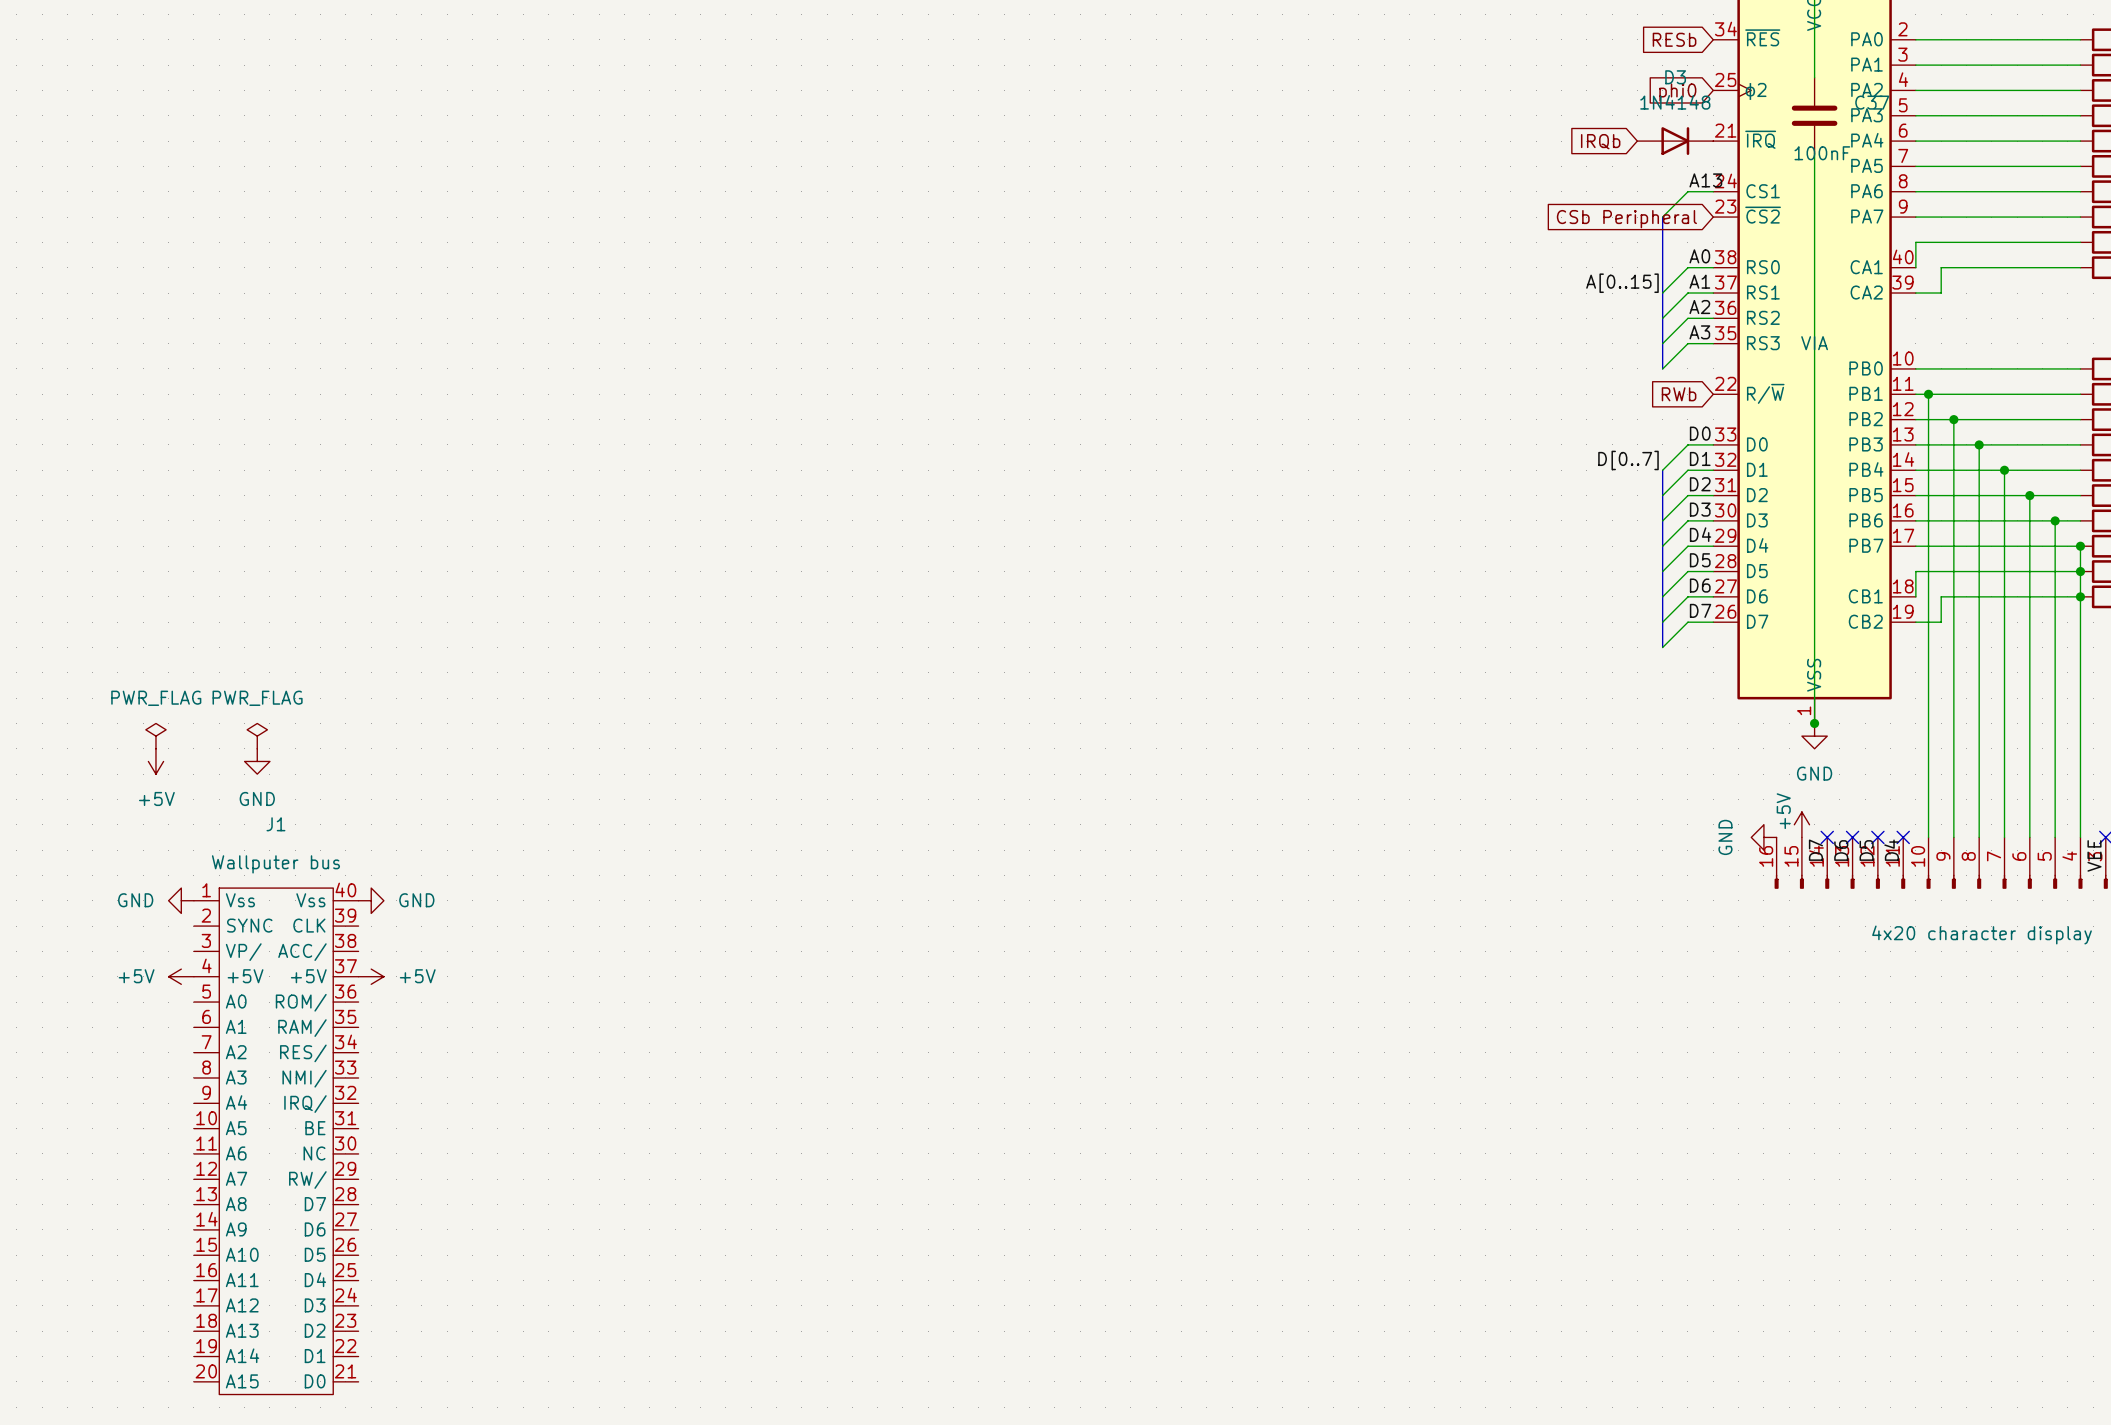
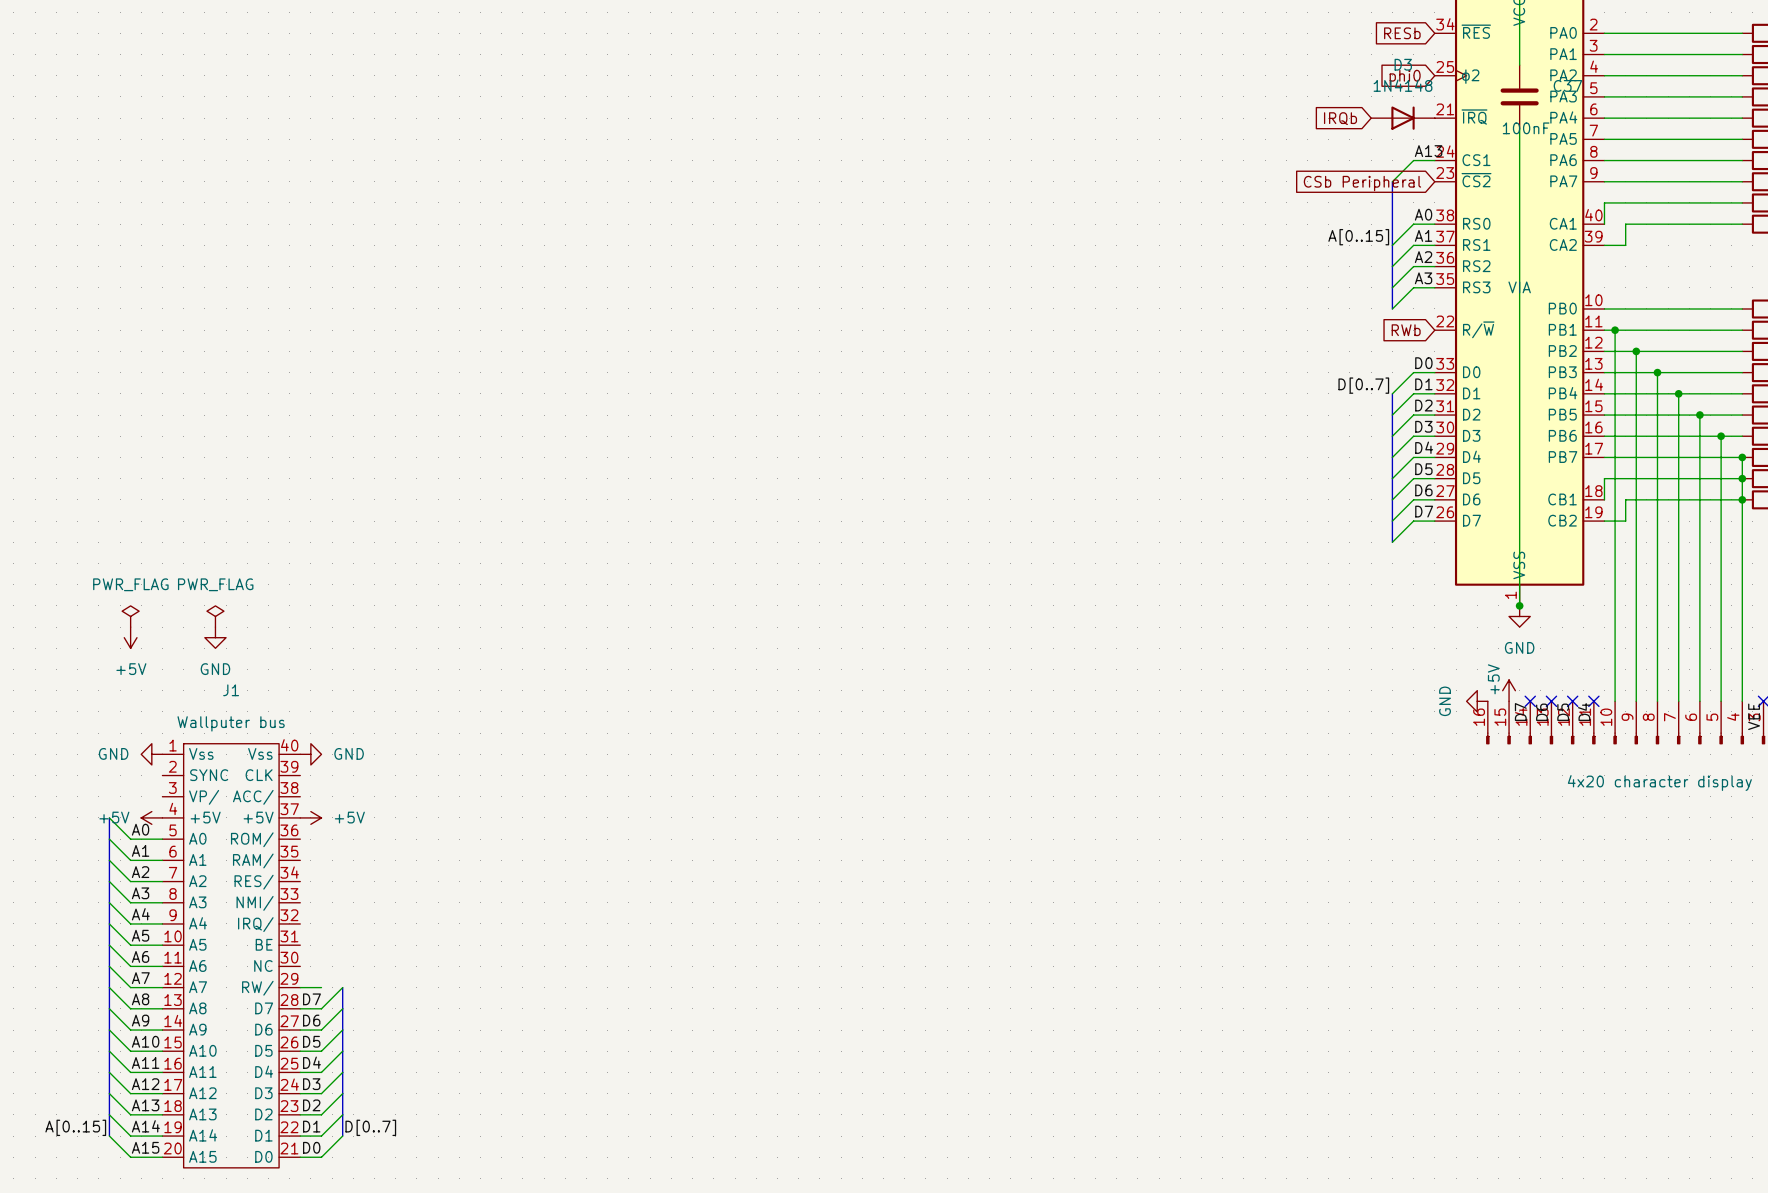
wire: none -> (109, 817) (130, 839) (162, 839)
bus: none -> (109, 817) (109, 1136)
label: none -> A0 (140, 829)
wire: none -> (109, 839) (130, 860) (162, 860)
label: none -> A1 (140, 850)
wire: none -> (109, 860) (130, 881) (162, 881)
label: none -> A2 (140, 872)
wire: none -> (109, 881) (130, 902) (162, 902)
label: none -> A3 (140, 893)
wire: none -> (109, 902) (130, 923) (162, 923)
label: none -> A4 (140, 914)
wire: none -> (109, 923) (130, 945) (162, 945)
label: none -> A5 (140, 935)
wire: none -> (109, 945) (130, 966) (162, 966)
label: none -> A6 (140, 956)
wire: none -> (109, 966) (130, 987) (162, 987)
label: none -> A7 (140, 978)
wire: none -> (109, 987) (130, 1008) (162, 1008)
wire: none -> (300, 987) (321, 987)
wire: none -> (342, 987) (321, 1008) (300, 1008)
bus: none -> (342, 987) (342, 1136)
label: none -> A8 (140, 999)
label: none -> D7 (311, 999)
wire: none -> (109, 1008) (130, 1030) (162, 1030)
wire: none -> (342, 1008) (321, 1030) (300, 1030)
label: none -> A9 (140, 1020)
label: none -> D6 (311, 1020)
wire: none -> (109, 1030) (130, 1051) (162, 1051)
wire: none -> (342, 1030) (321, 1051) (300, 1051)
label: none -> A10 (145, 1041)
label: none -> D5 (311, 1041)
wire: none -> (109, 1051) (130, 1072) (162, 1072)
wire: none -> (342, 1051) (321, 1072) (300, 1072)
label: none -> D4 (311, 1062)
label: none -> A11 (145, 1062)
wire: none -> (109, 1072) (130, 1093) (162, 1093)
wire: none -> (342, 1072) (321, 1093) (300, 1093)
label: none -> A12 (145, 1084)
label: none -> D3 (311, 1084)
wire: none -> (109, 1093) (130, 1114) (162, 1114)
wire: none -> (342, 1093) (321, 1114) (300, 1114)
label: none -> A13 (145, 1105)
label: none -> D2 (311, 1105)
wire: none -> (109, 1114) (130, 1136) (162, 1136)
wire: none -> (342, 1114) (321, 1136) (300, 1136)
label: none -> A14 (145, 1126)
label: none -> D1 (311, 1126)
label: none -> A[0..15] (75, 1127)
label: none -> D[0..7] (370, 1127)
wire: none -> (109, 1136) (130, 1157) (162, 1157)
wire: none -> (342, 1136) (321, 1157) (300, 1157)
label: none -> A15 (145, 1147)
label: none -> D0 (311, 1147)

